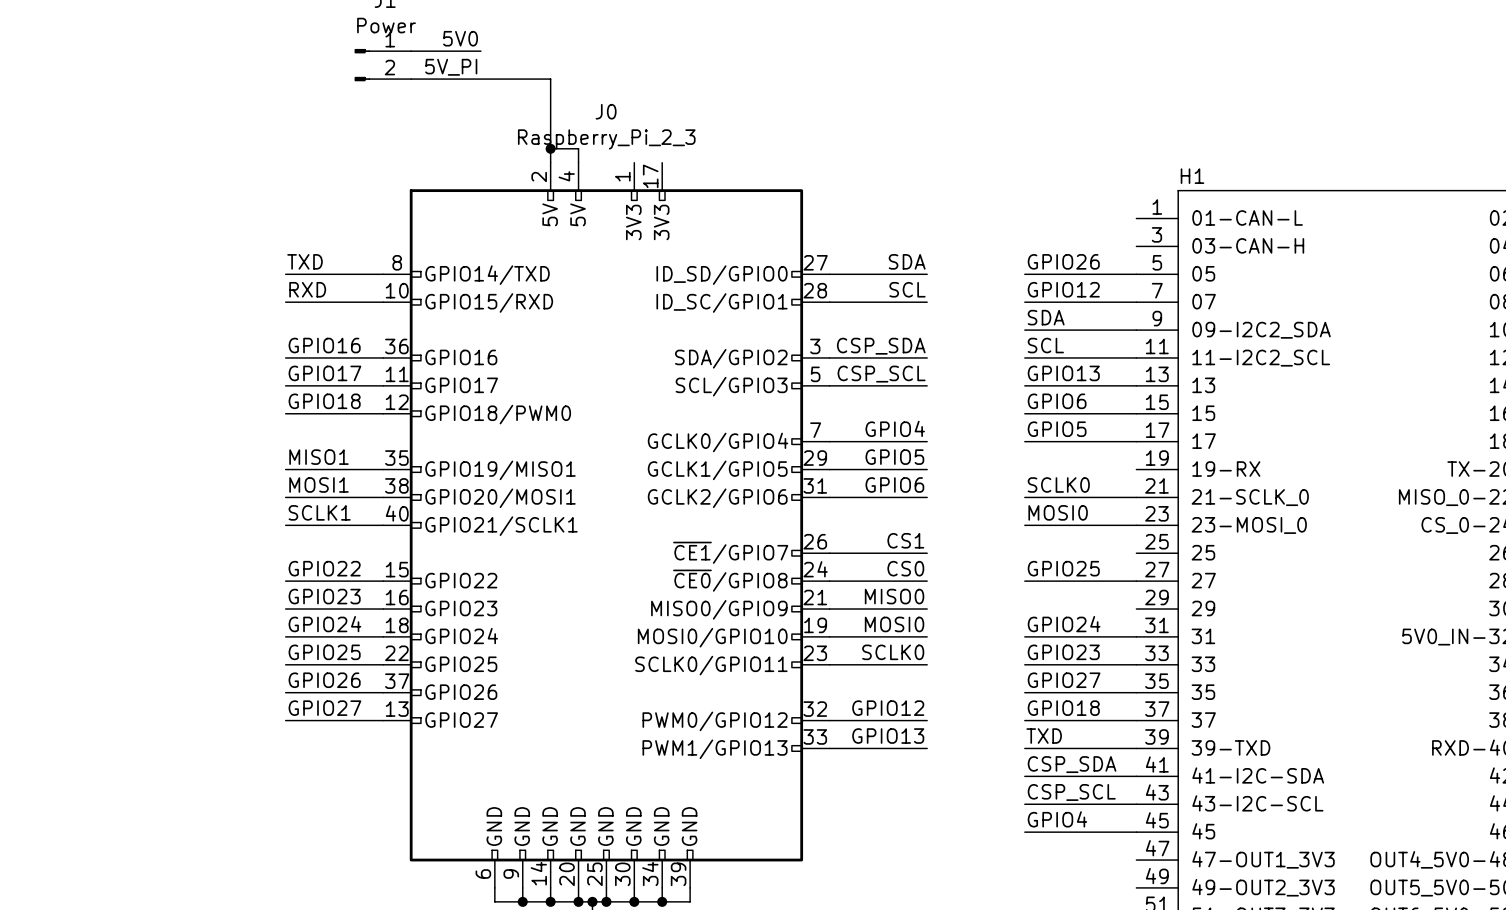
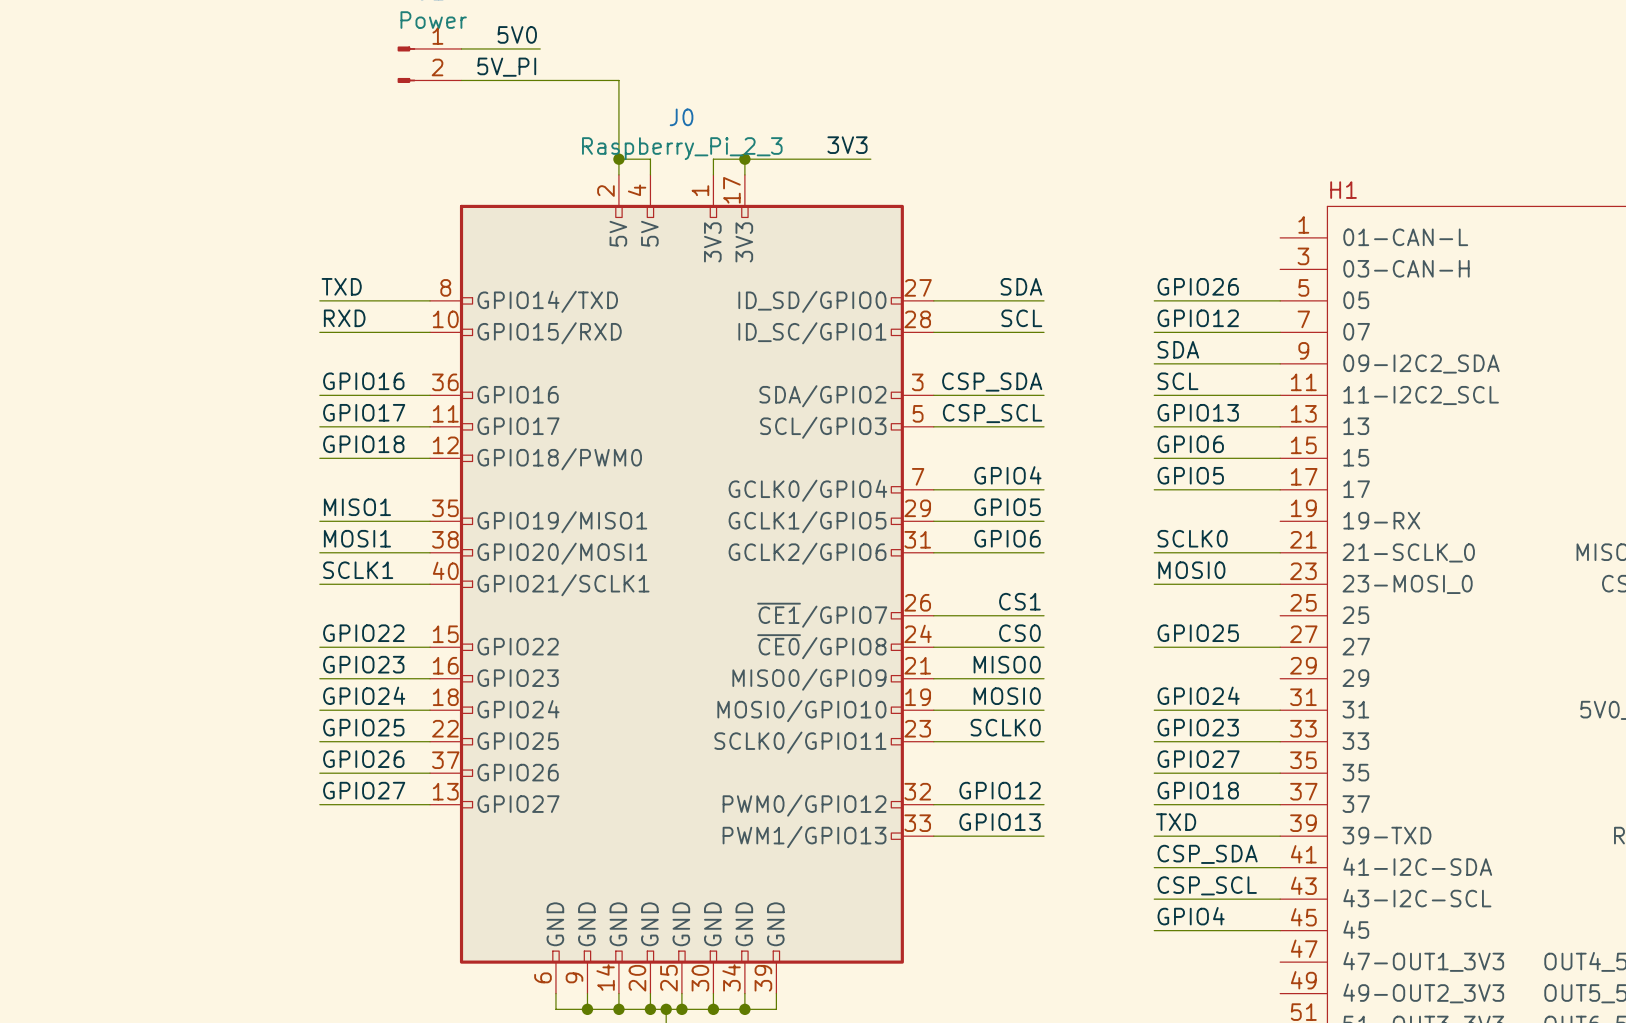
label: none -> 3V3 (847, 145)
wire: none -> (744, 159) (744, 174)
junction: none -> (744, 159)
wire: none -> (870, 159) (713, 159) (713, 174)

